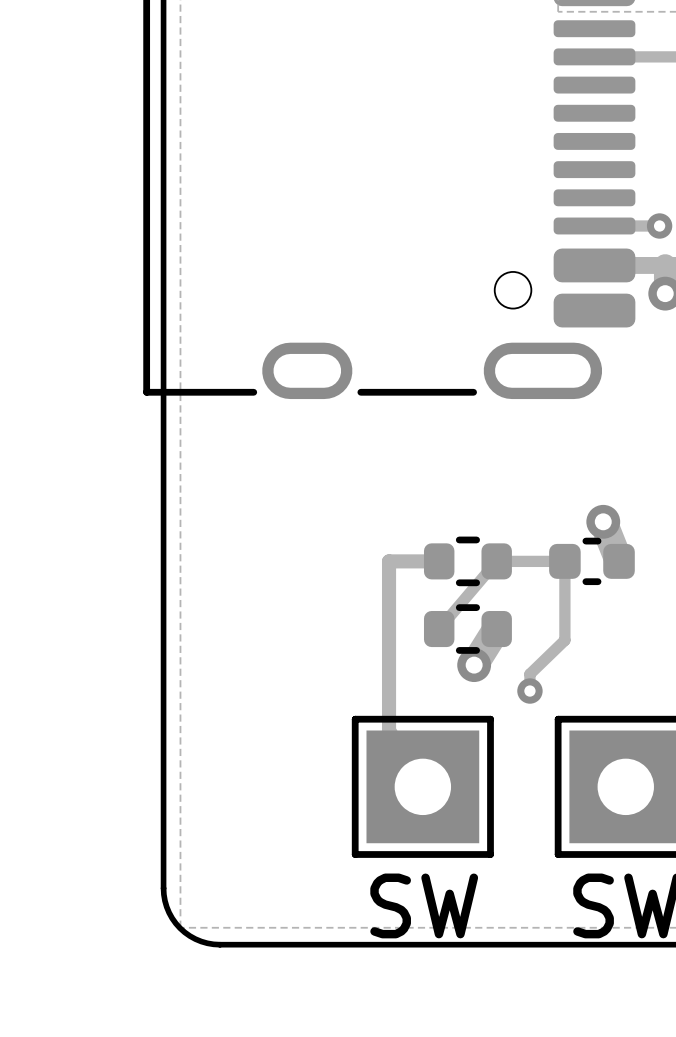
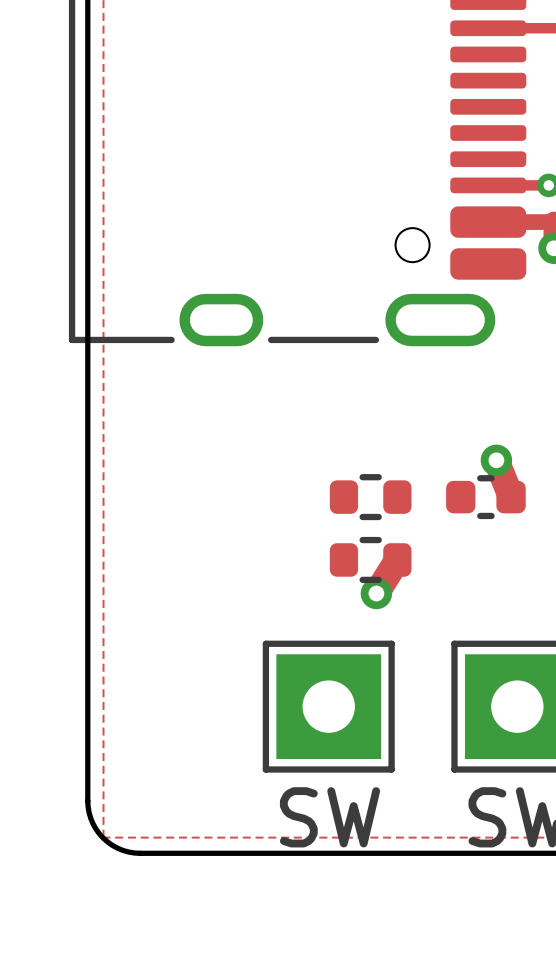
track: (439, 561) (389, 561) (389, 730) (422, 786) -> none
track: (439, 629) (496, 561) (564, 561) (564, 640) (529, 674) (529, 691) -> none
via: (529, 691) -> none

